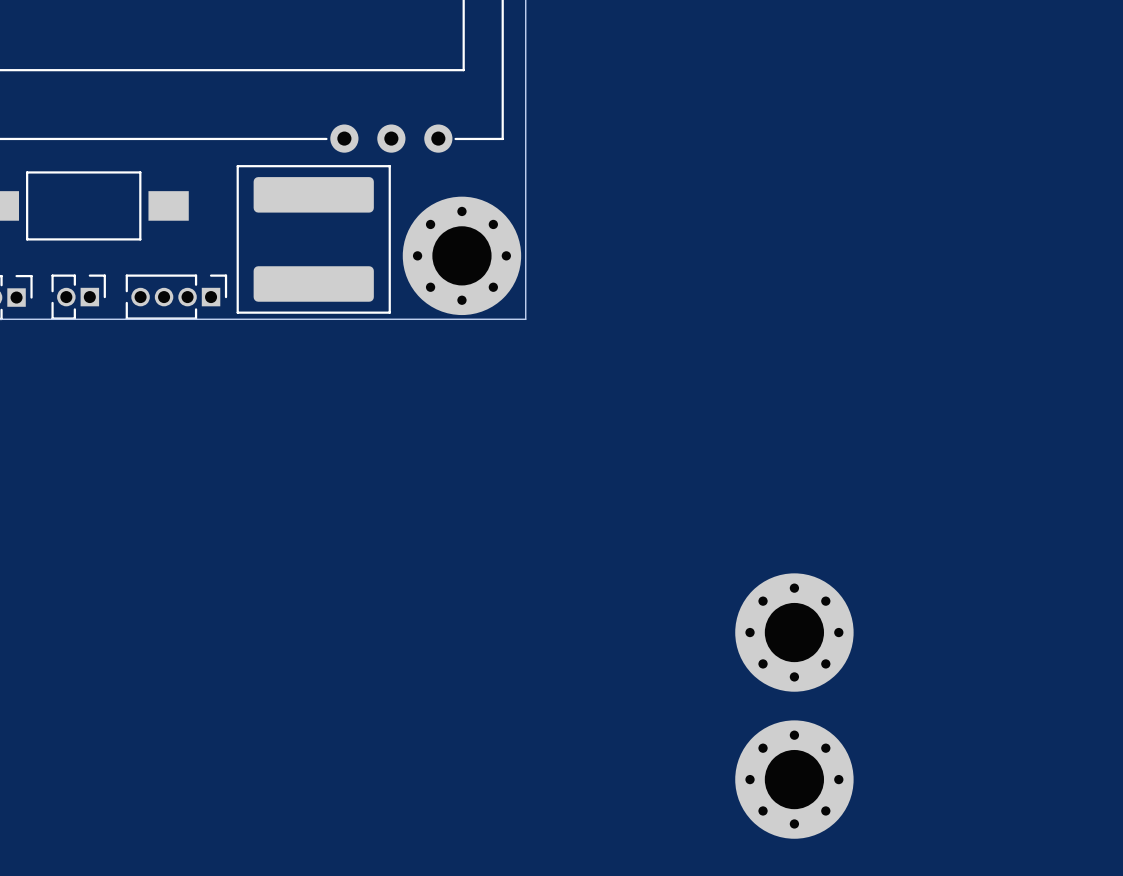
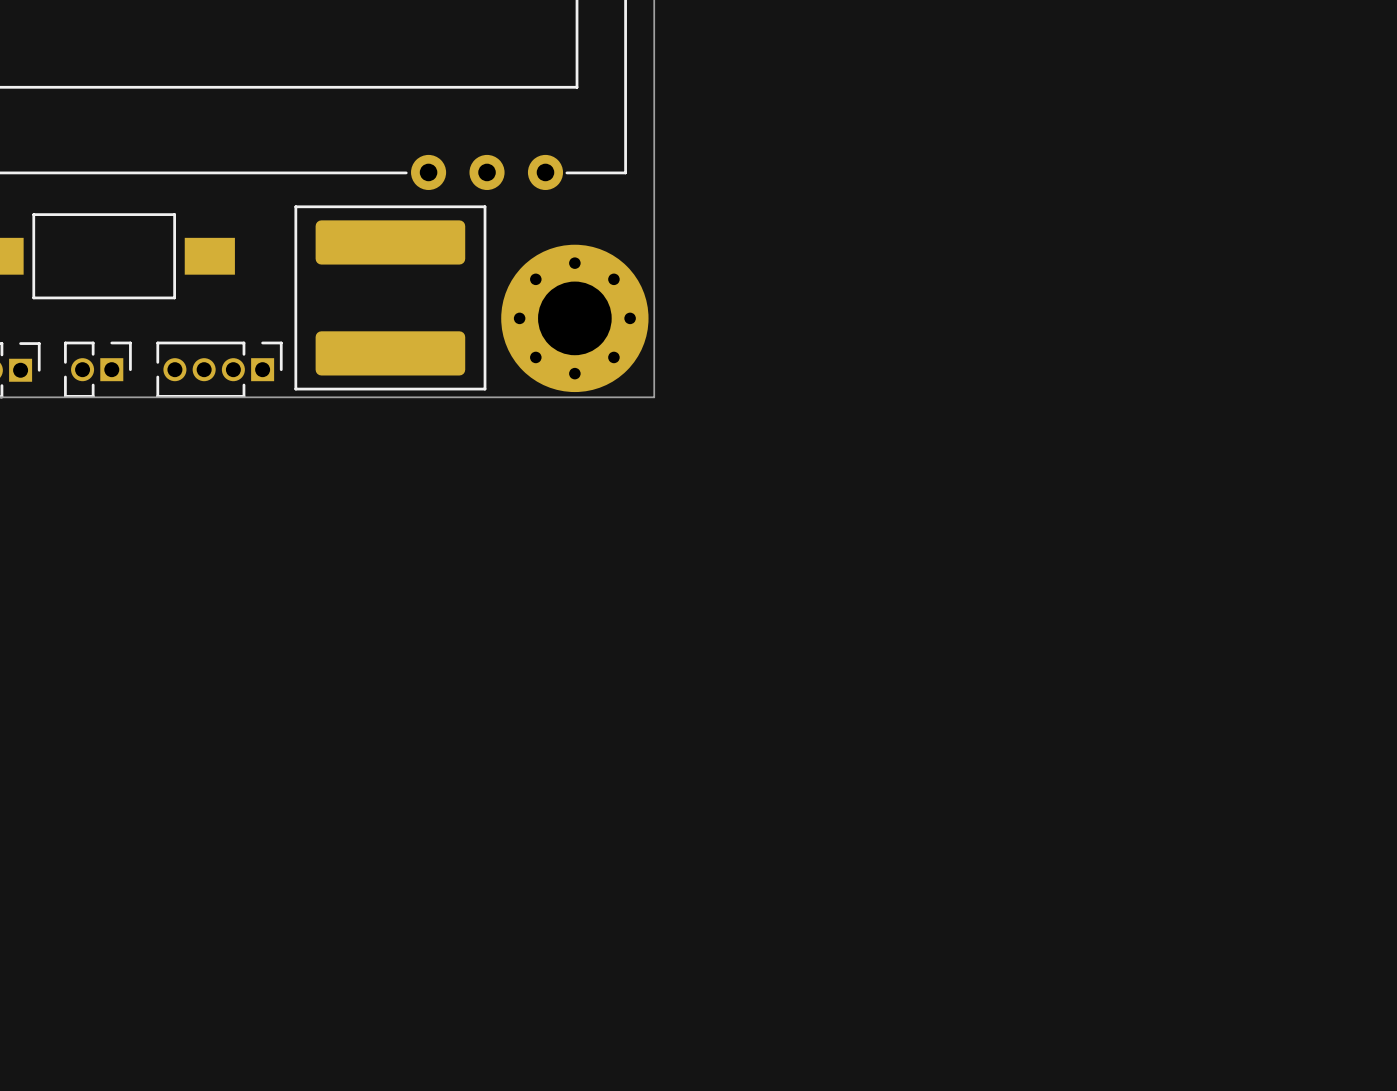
part: (794, 632) -> none
part: (794, 779) -> none

